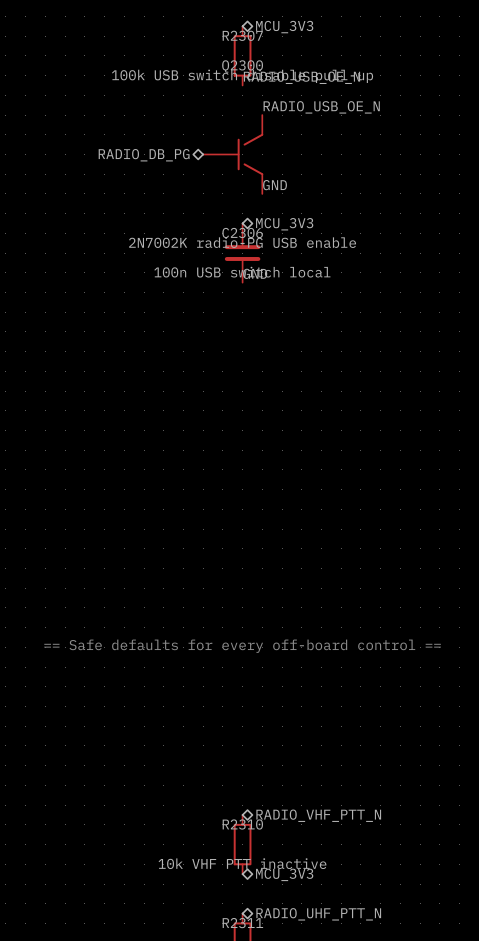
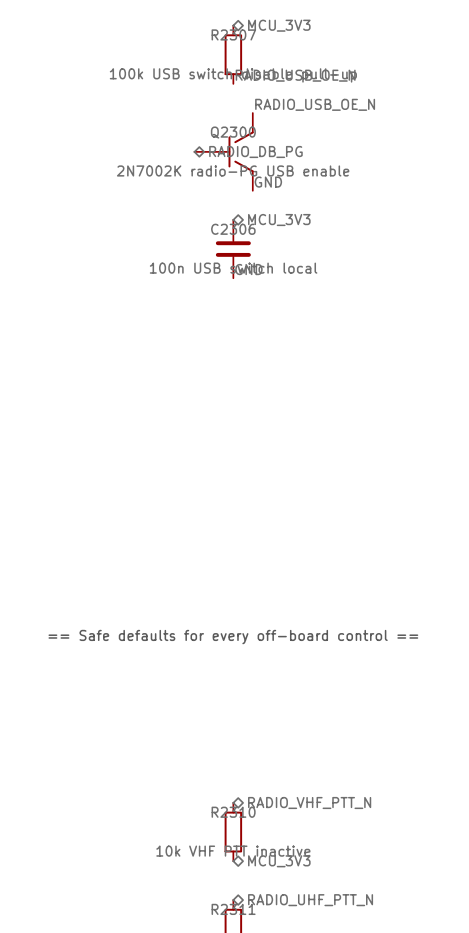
Q2300 name position: Q2300 (242, 66) -> Q2300 (233, 132)
hierarchical label rotation: 0° (144, 155) -> 180° (255, 152)
hierarchical label position: RADIO_DB_PG (144, 155) -> RADIO_DB_PG (255, 152)
Q2300 value position: 2N7002K radio-PG USB enable (242, 242) -> 2N7002K radio-PG USB enable (233, 170)

